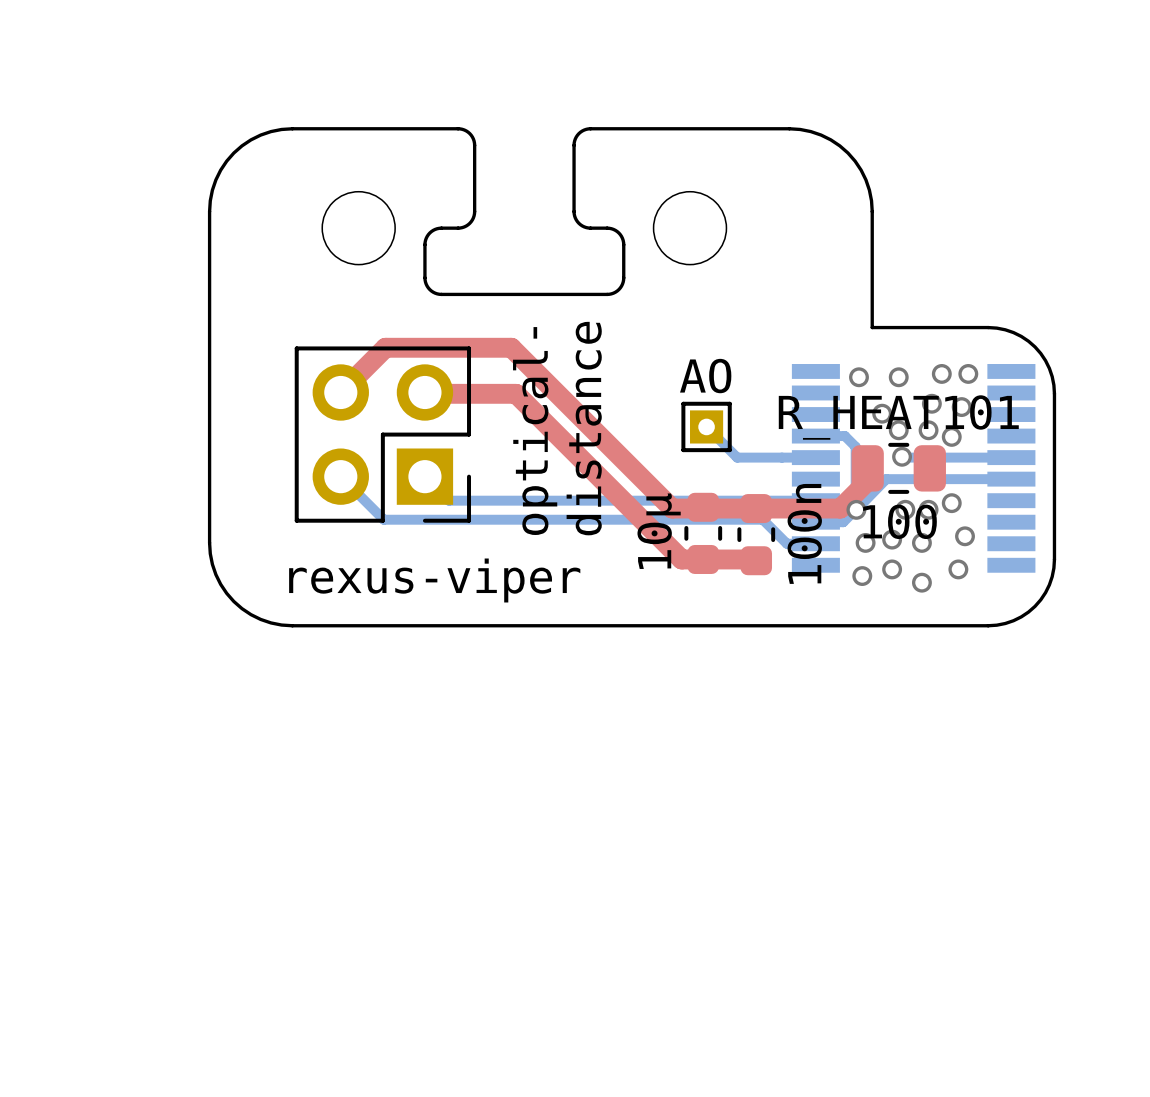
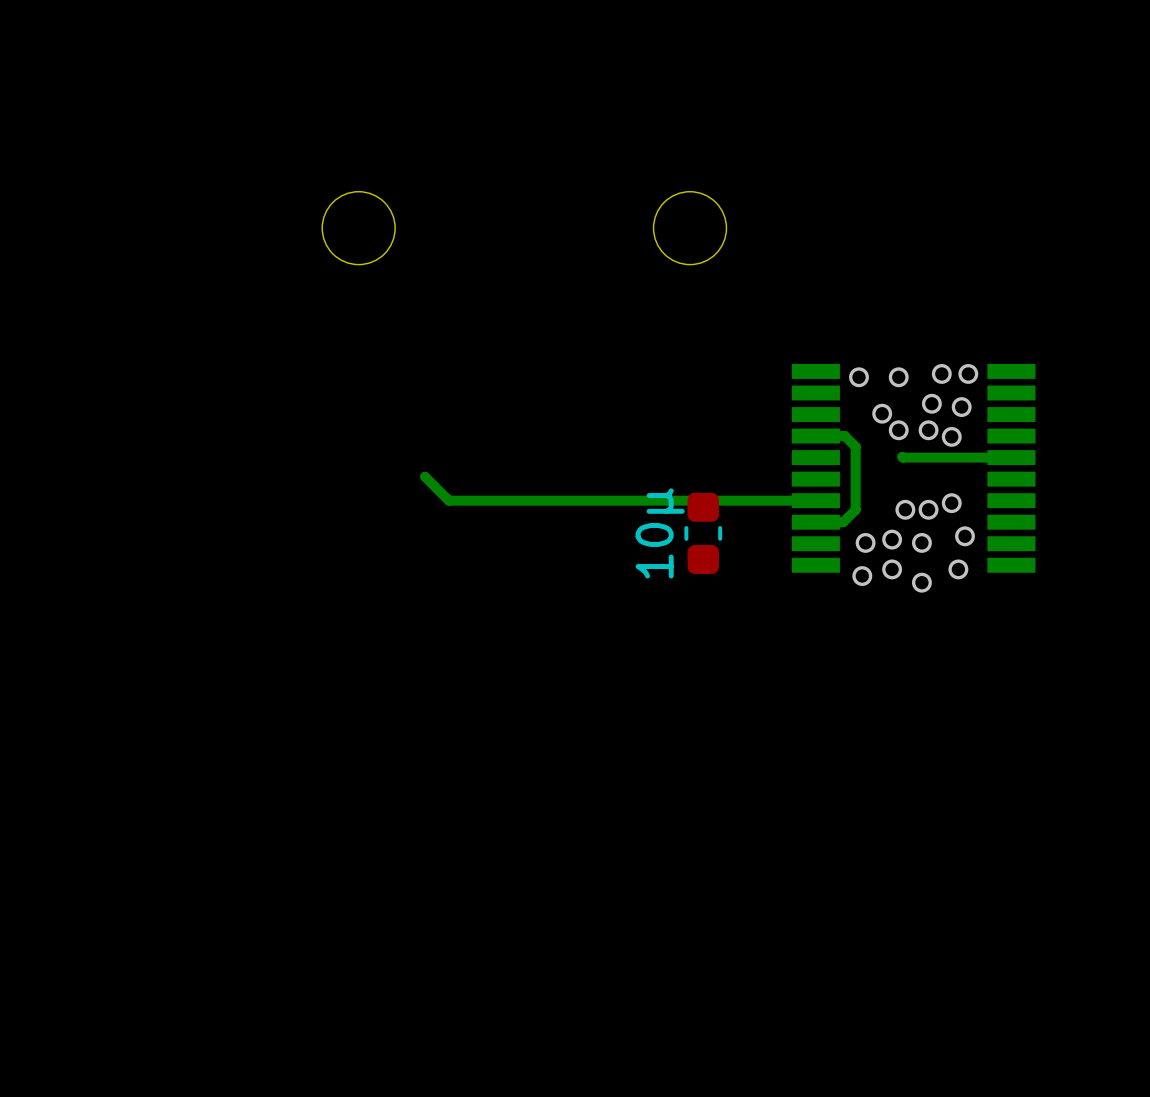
board edge: (292, 128) (458, 128) (469, 133) (474, 145) (473, 217) (469, 223) (462, 227) (433, 230) (428, 234) (425, 242) (425, 282) (431, 291) (441, 294) (607, 294) (613, 293) (620, 287) (623, 277) (623, 244) (621, 236) (611, 228) (584, 226) (577, 221) (574, 215) (574, 143) (577, 135) (584, 130) (789, 128) (810, 131) (830, 139) (855, 161) (869, 190) (872, 211) (872, 327) (988, 327) (1005, 329) (1028, 341) (1040, 353) (1049, 368) (1054, 393) (1054, 559) (1052, 576) (1045, 592) (1035, 606) (1021, 616) (1005, 623) (988, 625) (292, 625) (270, 622) (251, 614) (226, 593) (215, 574) (210, 553) (210, 200) (220, 170) (241, 145) (270, 131) (292, 128) -> none
top track: (340, 392) (385, 347) (511, 347) (672, 508) (840, 508) (867, 481) (867, 468) -> none
top track: (424, 392) (516, 393) (681, 559) (756, 560) -> none
bottom track: (706, 426) (737, 457) (815, 457) -> none
part: AO (706, 426) -> none
text: distance (584, 428) -> none
text: optical- (535, 431) -> none
part: (382, 434) -> none
via: (902, 456) -> none
R_HEAT101: 100 (898, 468) -> none
bottom track: (340, 476) (383, 519) (762, 519) (786, 543) (815, 543) -> none
bottom track: (1011, 479) (886, 479) (855, 509) -> none
via: (856, 509) -> none
part: 100n (756, 534) -> none
text: rexus-viper (434, 580) -> none

